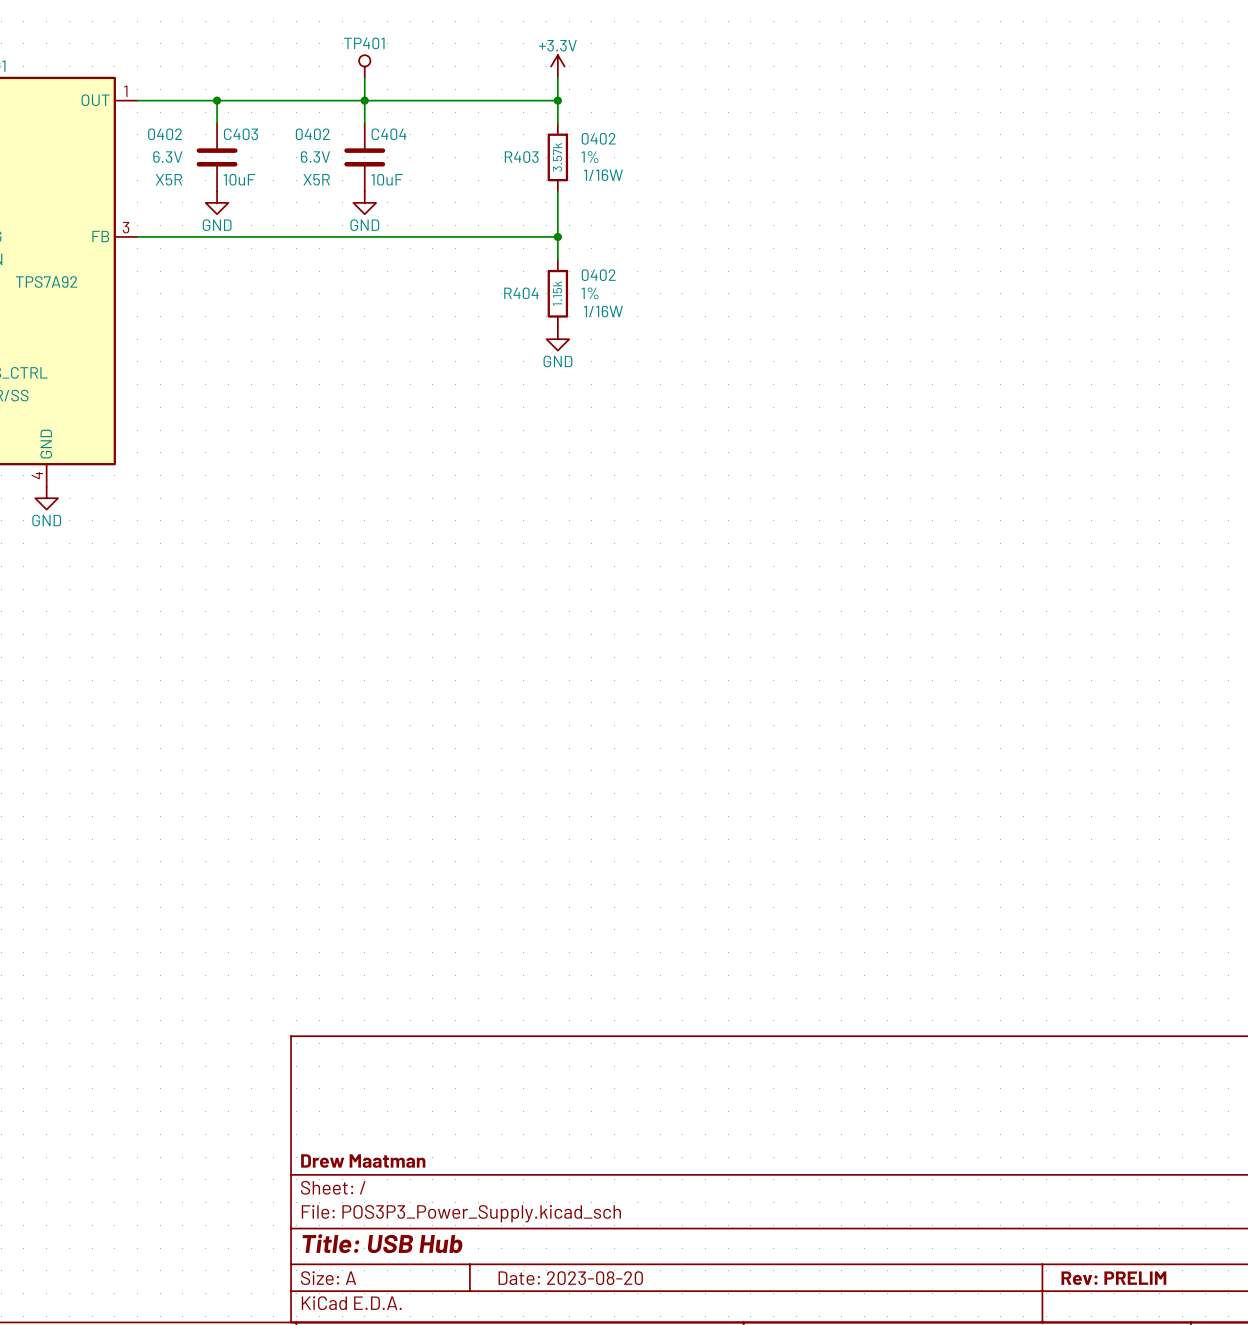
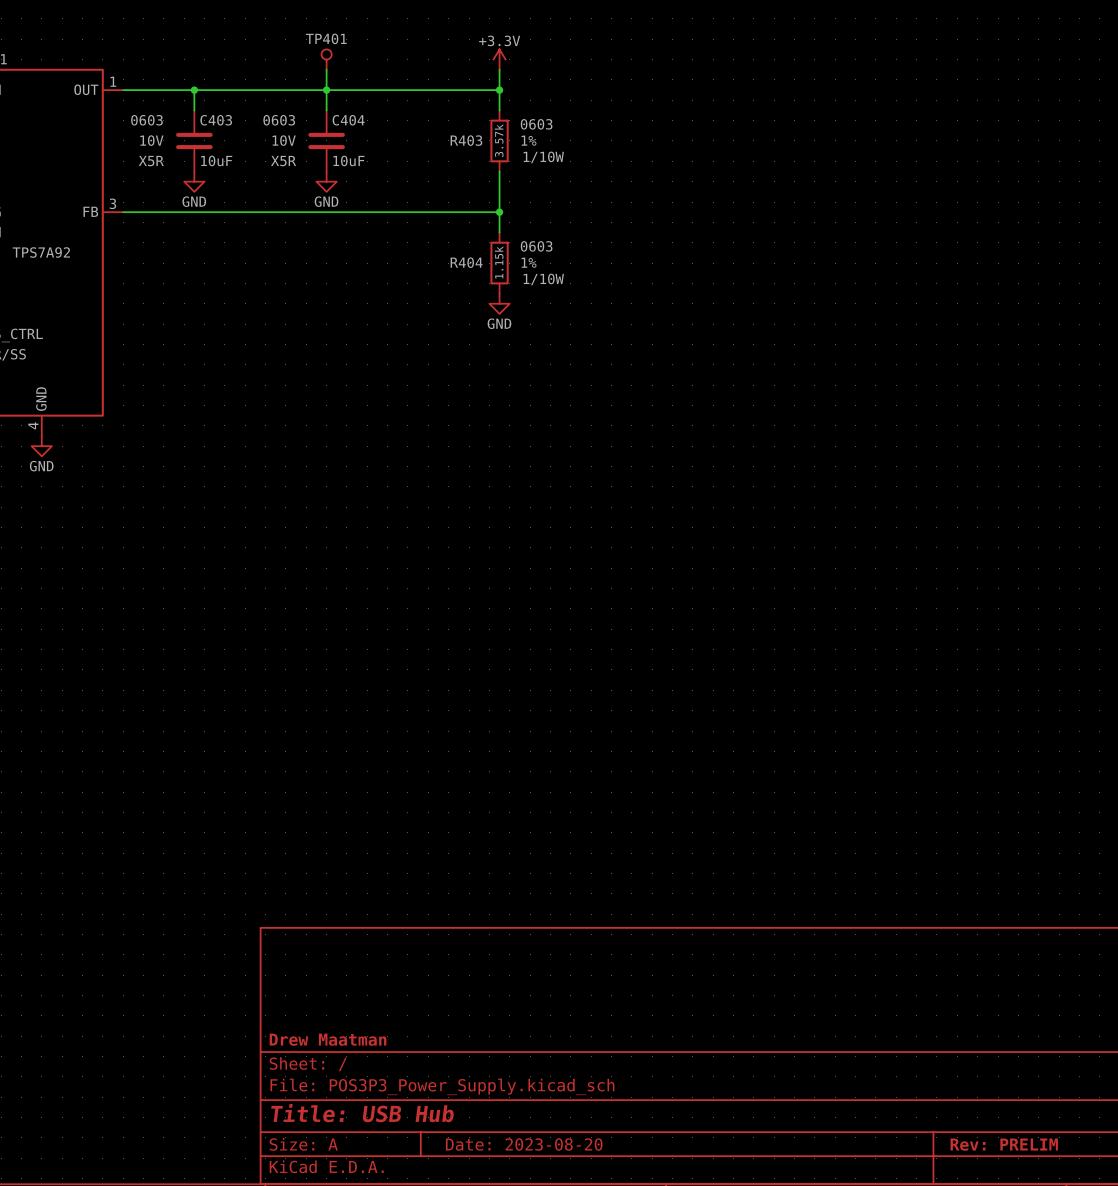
C403 text: 0402 (165, 134) -> 0603 (146, 120)
C404 text: 0402 (312, 134) -> 0603 (279, 120)
R403 text: 0402 (598, 138) -> 0603 (536, 124)
C403 text: 6.3V (167, 157) -> 10V (151, 140)
C404 text: 6.3V (315, 157) -> 10V (284, 140)
R403 text: 1/16W (603, 175) -> 1/10W (543, 157)
R404 text: 0402 (598, 275) -> 0603 (536, 246)
R404 text: 1/16W (603, 311) -> 1/10W (543, 279)

